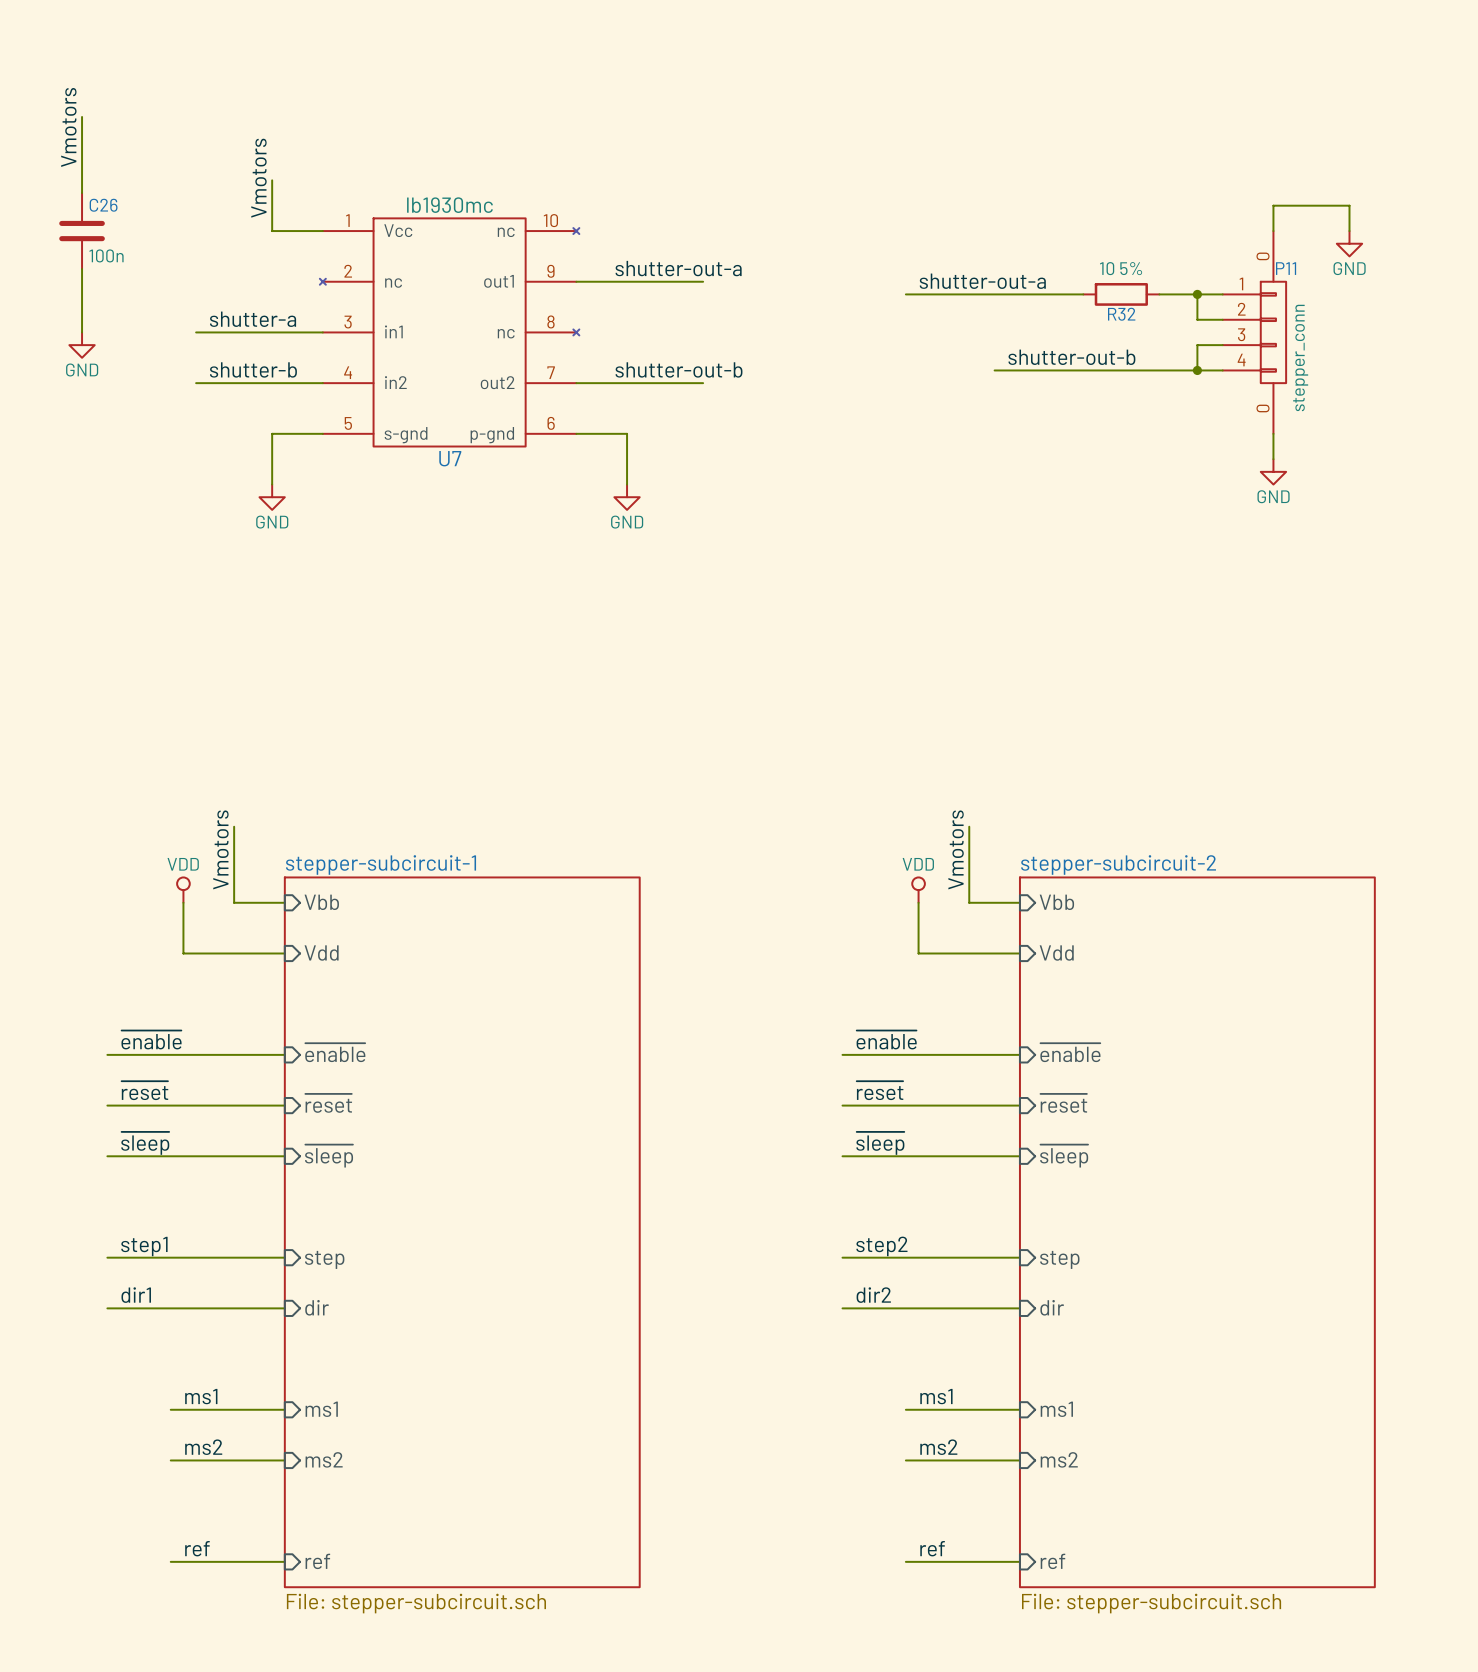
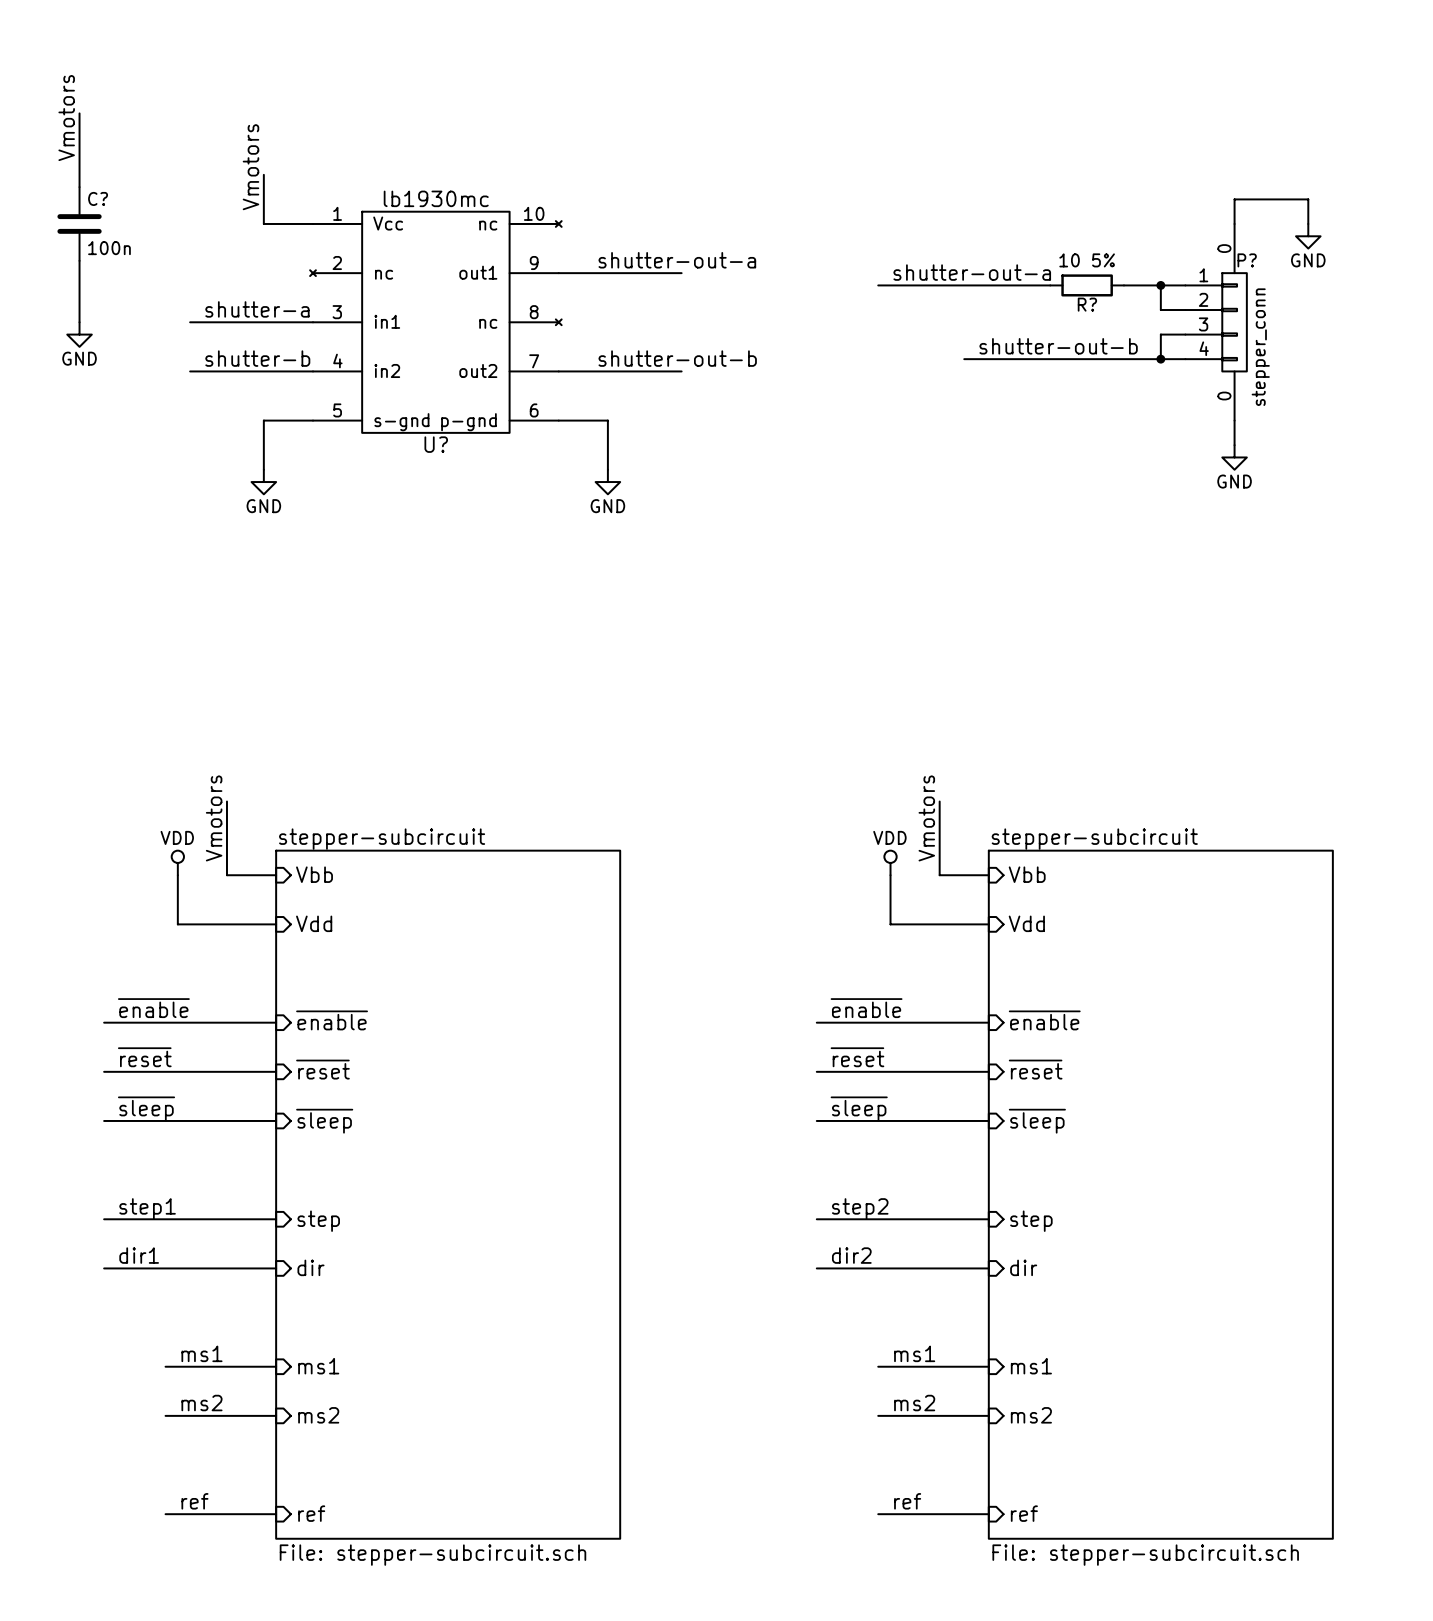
C26 name: C26 (103, 205) -> C? (98, 198)
P11 name: P11 (1286, 268) -> P? (1247, 260)
R32 name: R32 (1121, 314) -> R? (1087, 304)
U7 name: U7 (450, 458) -> U? (436, 444)
sheet stepper-subcircuit-1 name: stepper-subcircuit-1 (381, 864) -> stepper-subcircuit (382, 839)
sheet stepper-subcircuit-2 name: stepper-subcircuit-2 (1118, 864) -> stepper-subcircuit (1094, 839)

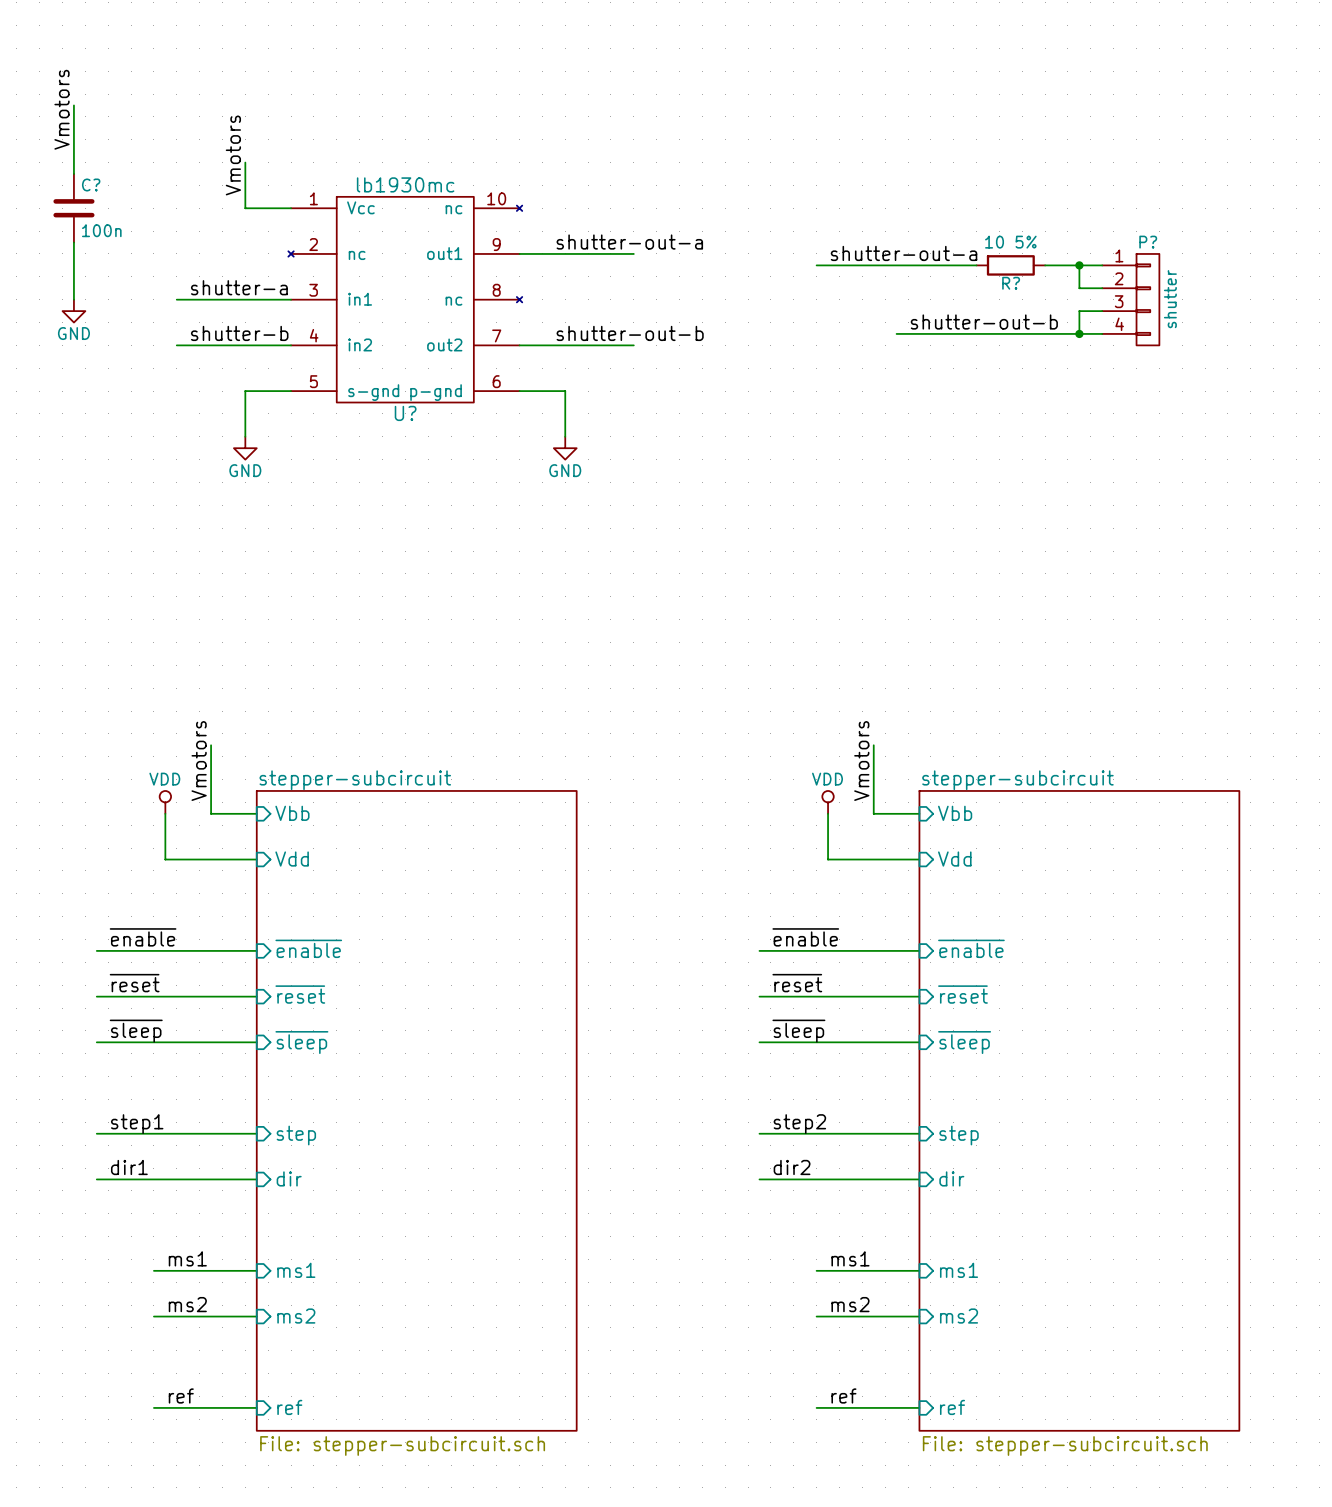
P? symbol: [1185, 223, 1247, 421] -> [1102, 253, 1160, 346]
wire: (1234, 223) (1234, 199) (1308, 199) (1308, 223) -> none
power symbol: GND (1308, 236) -> none
P? value: stepper_conn (1260, 347) -> shutter (1170, 299)
wire: (1234, 420) (1234, 445) -> none
power symbol: GND (1234, 457) -> none

